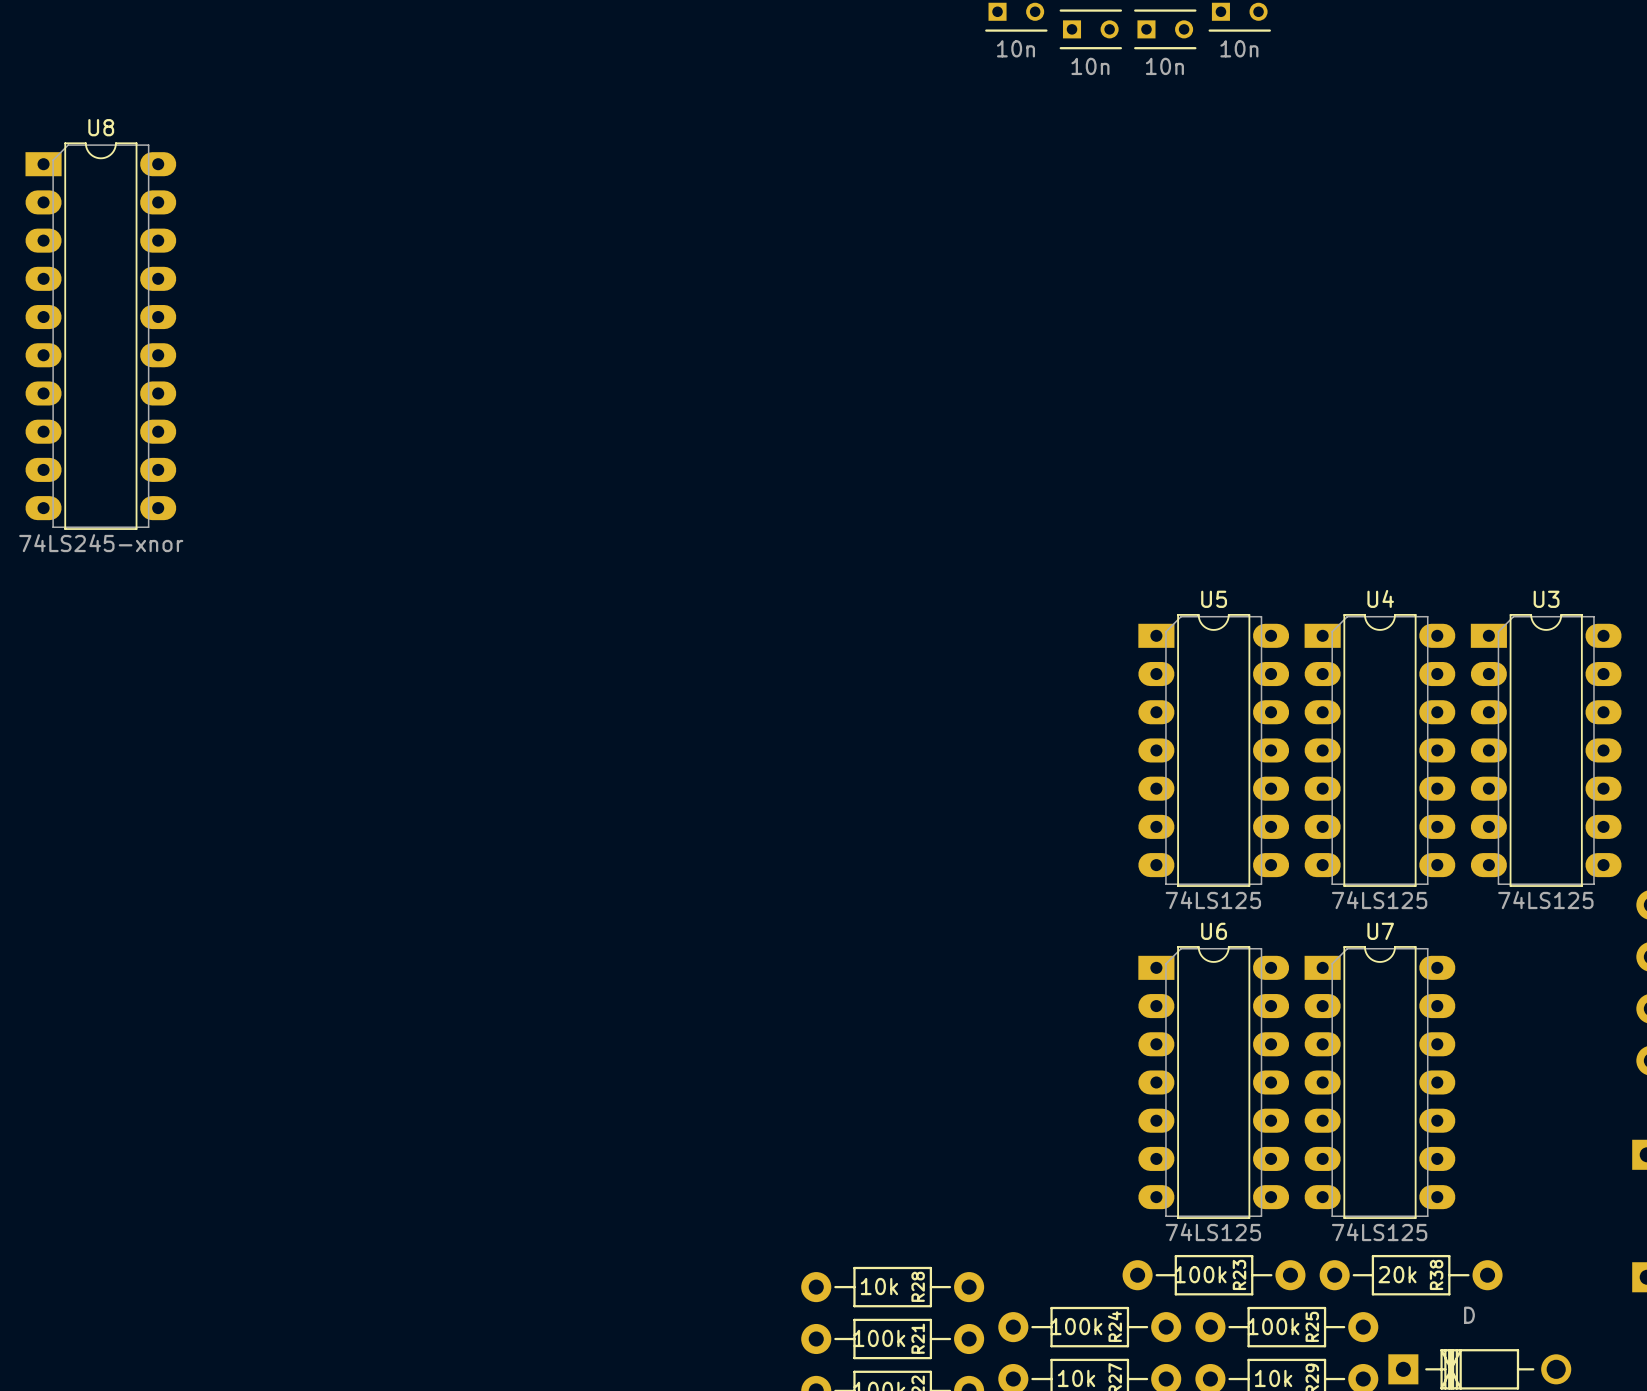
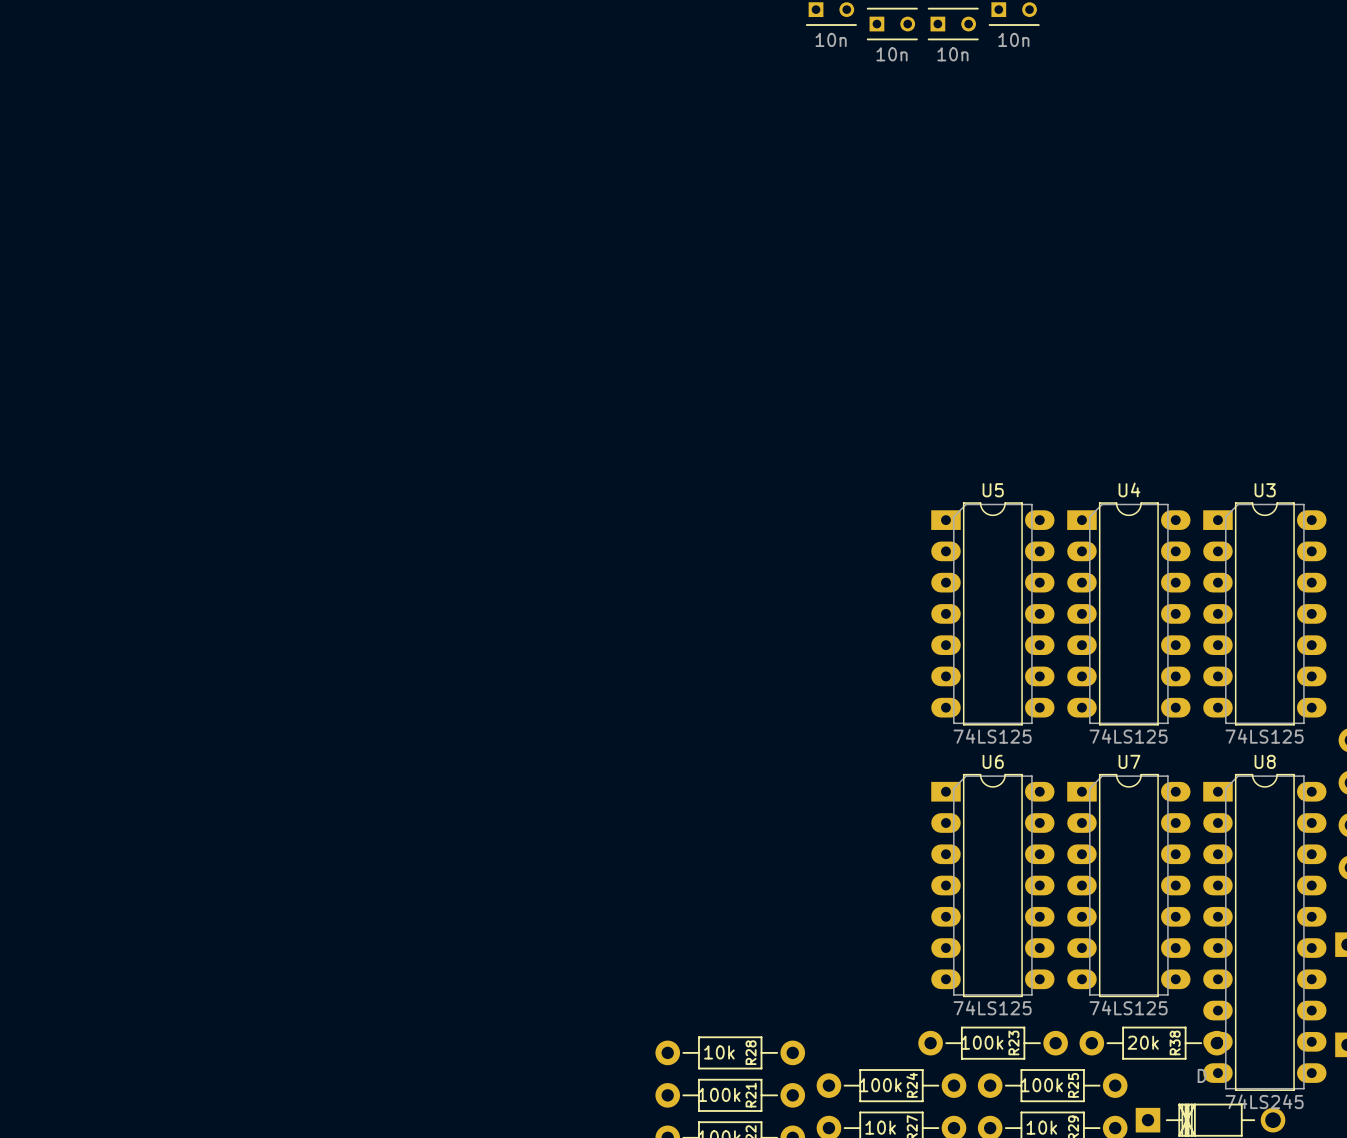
U8 position: (100, 336) -> (1264, 932)
U8 value: 74LS245-xnor (101, 543) -> 74LS245 (1264, 1101)

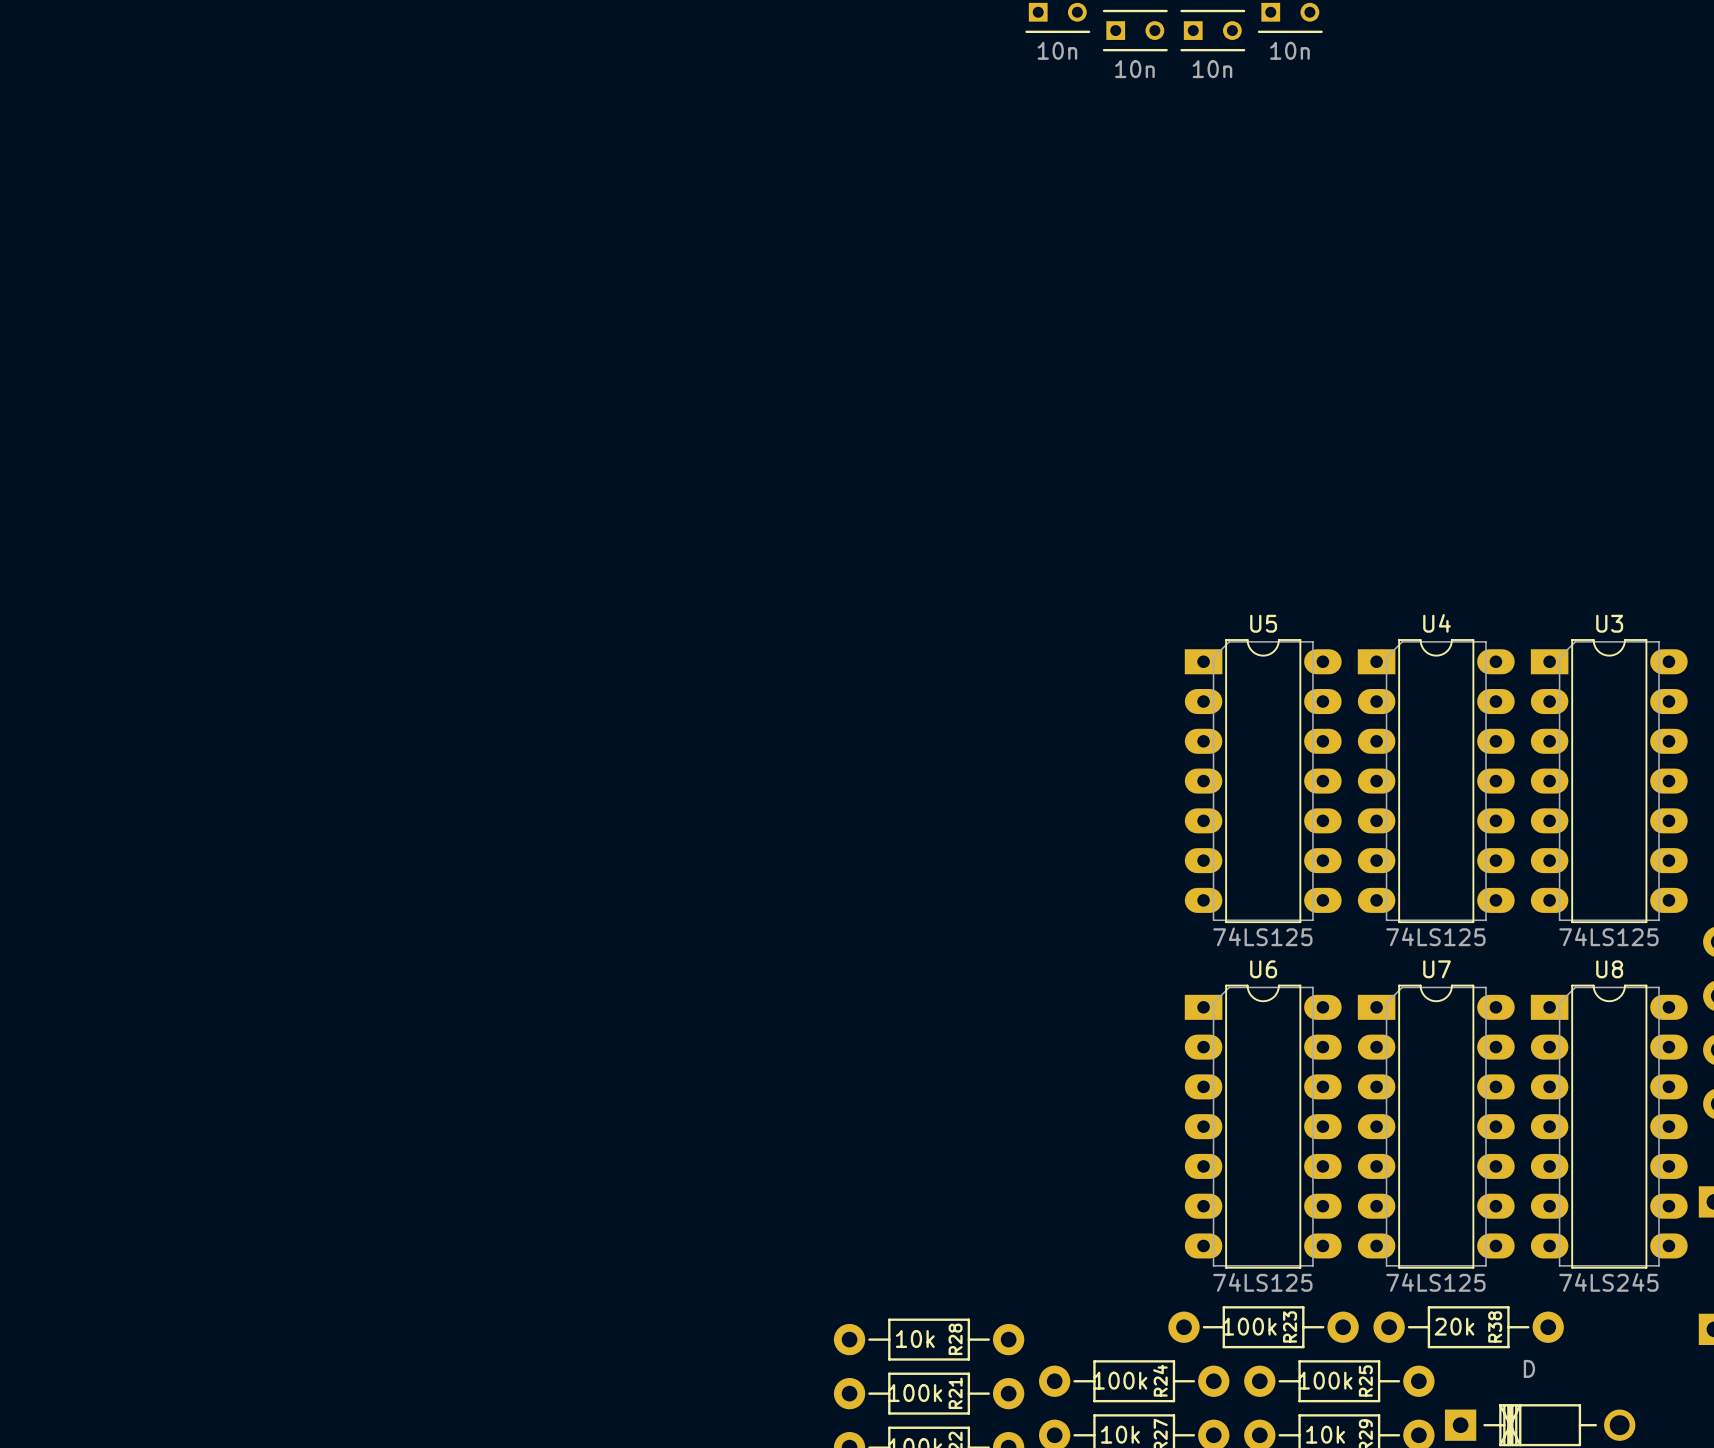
U8 footprint: [1203, 773, 1327, 1091] -> [1530, 984, 1688, 1269]
U8 value position: 74LS245 (1264, 1101) -> 74LS245 (1608, 1282)

